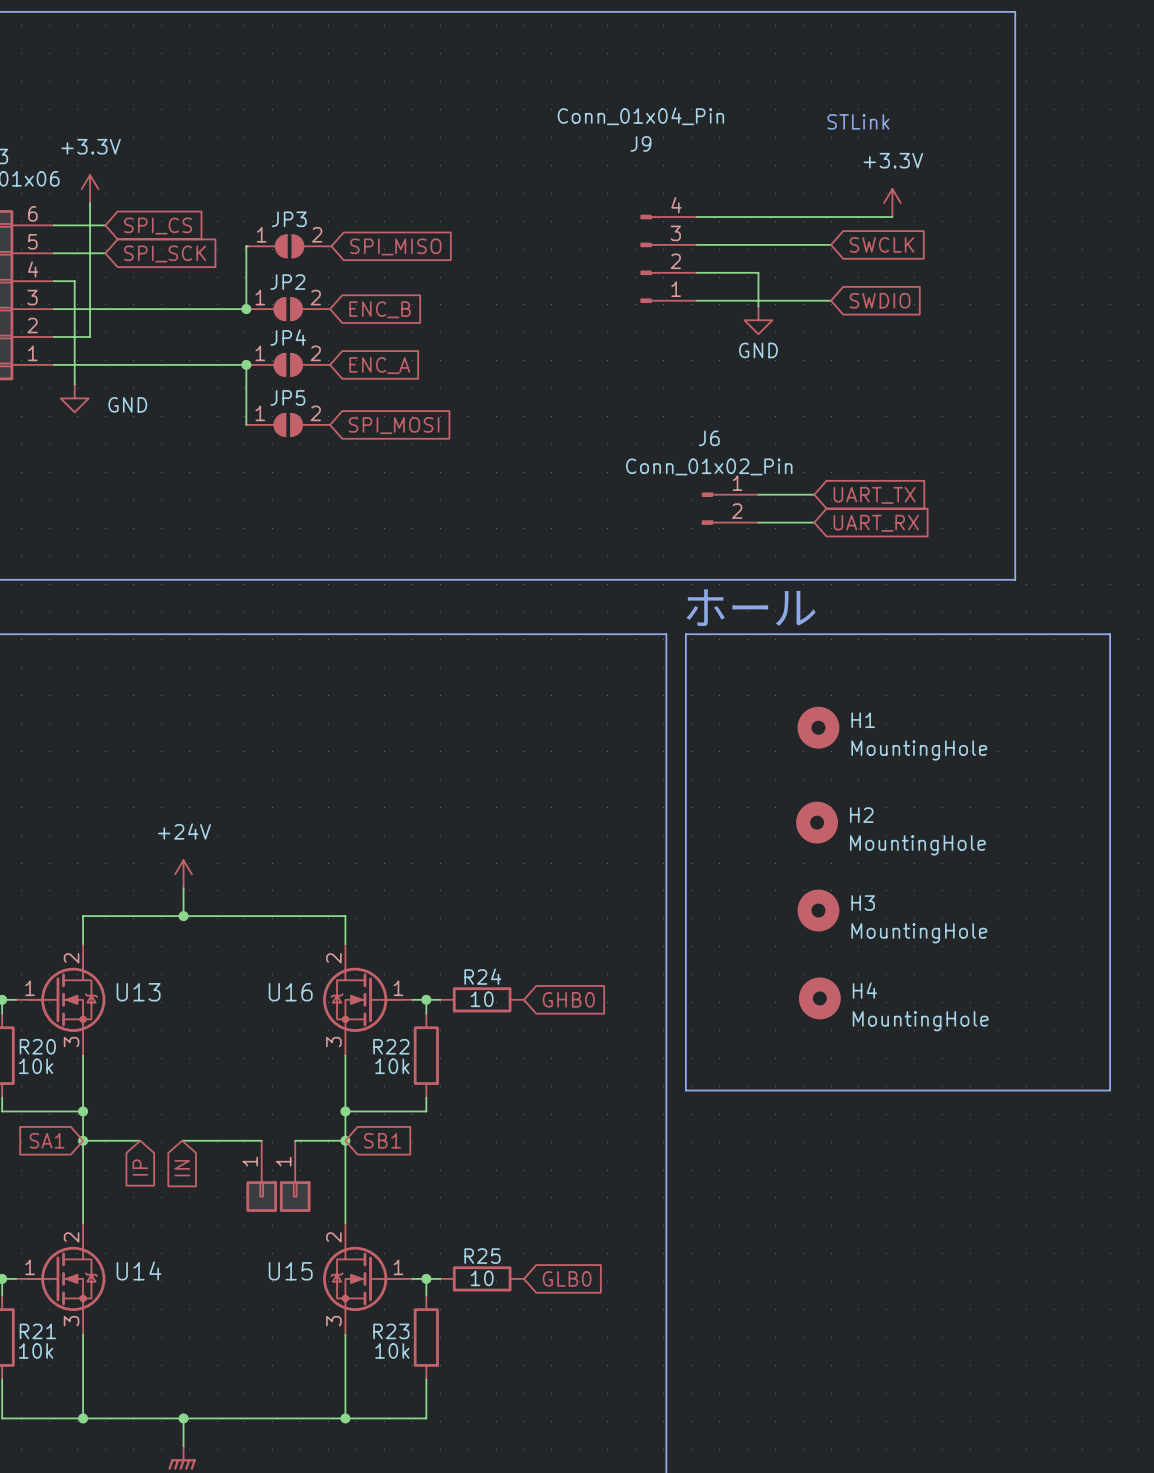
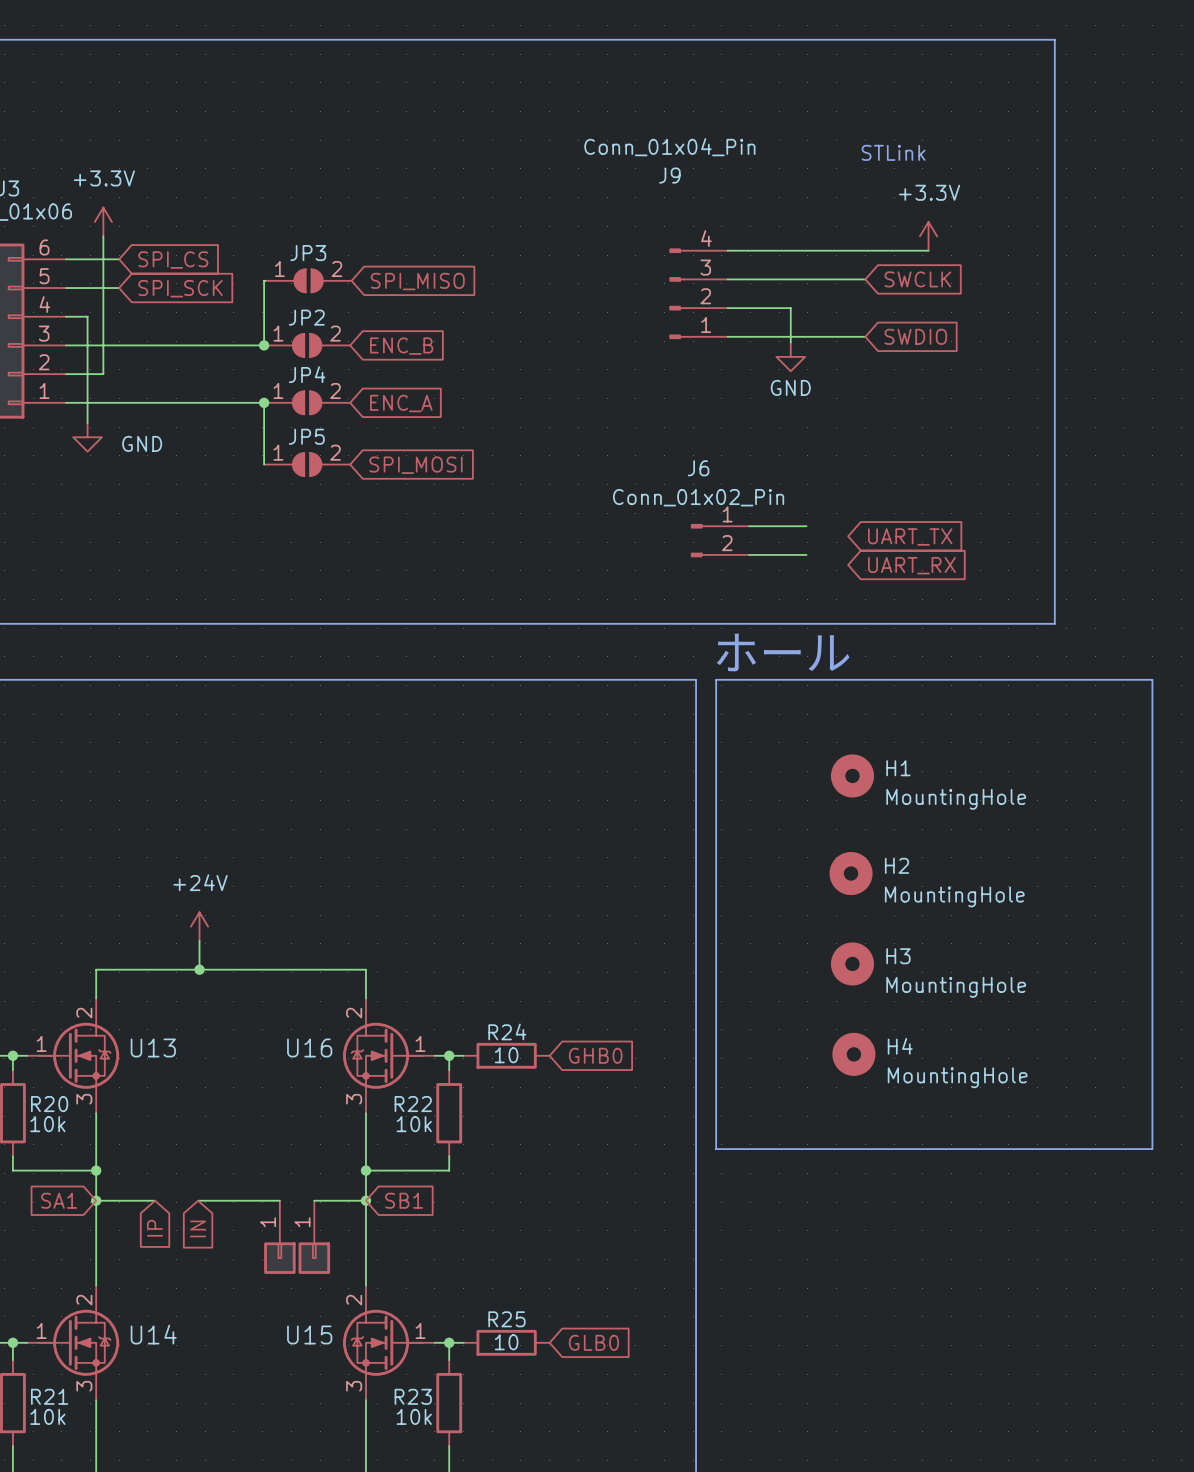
wire: (758, 494) (814, 494) -> (749, 526) (806, 526)
J6 position: (730, 508) -> (720, 540)
wire: (758, 522) (814, 522) -> (749, 554) (806, 554)

